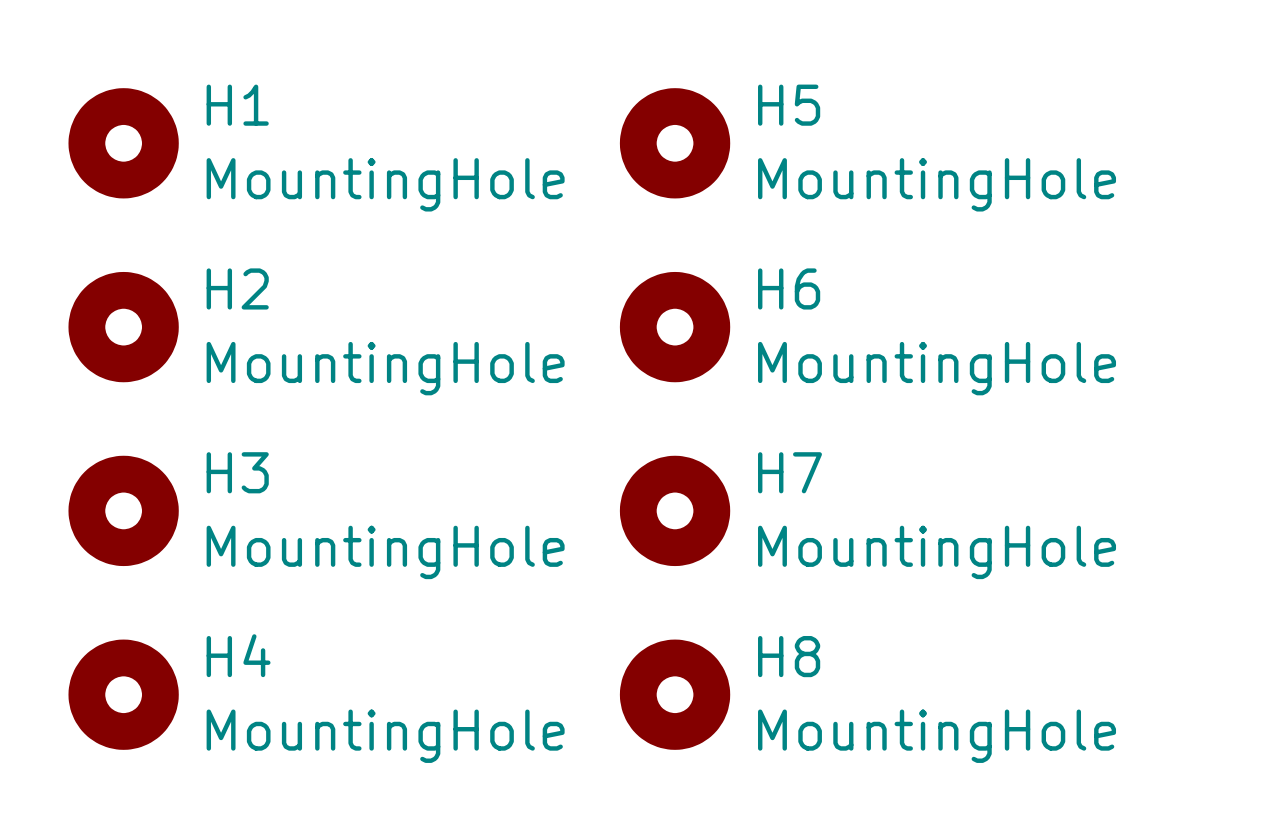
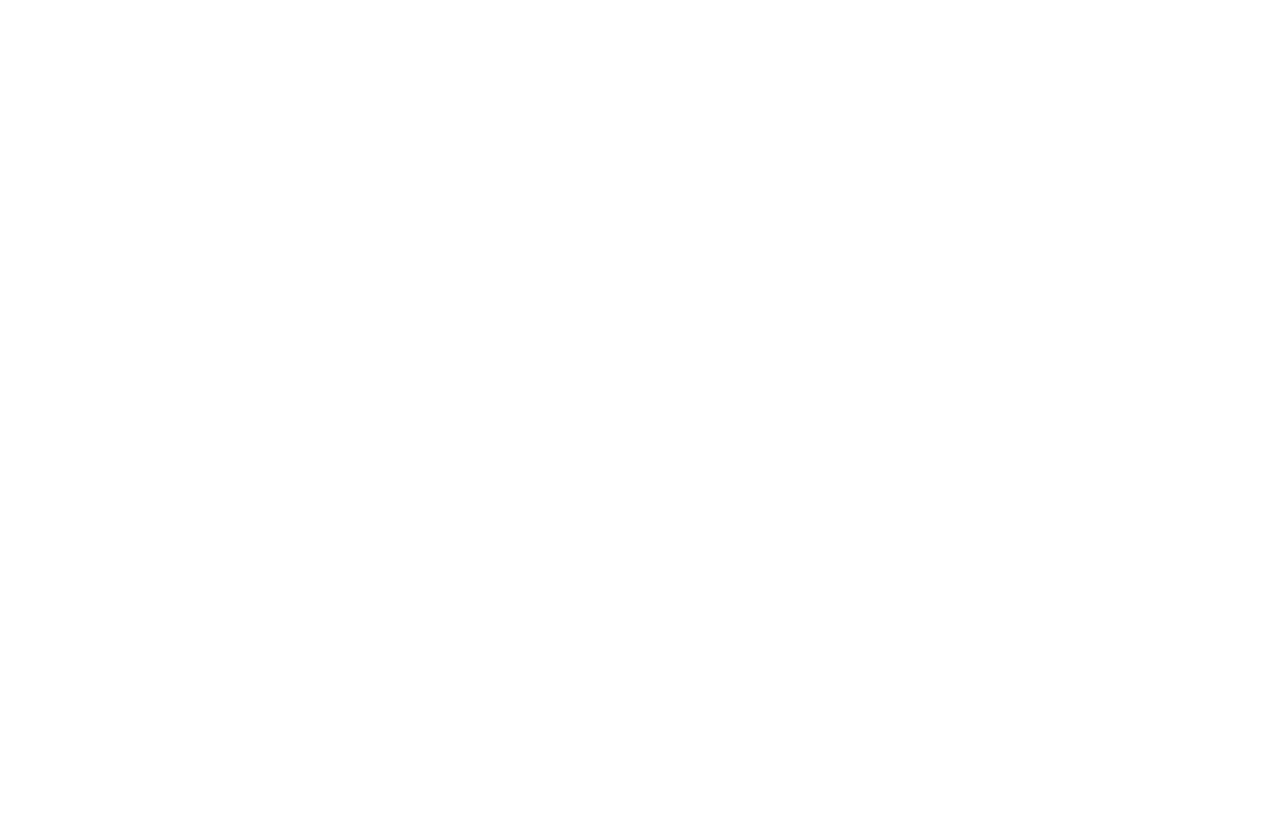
H1: MountingHole (123, 143) -> none
H5: MountingHole (675, 143) -> none
H2: MountingHole (123, 327) -> none
H6: MountingHole (675, 327) -> none
H3: MountingHole (123, 510) -> none
H7: MountingHole (675, 510) -> none
H4: MountingHole (123, 694) -> none
H8: MountingHole (675, 694) -> none

